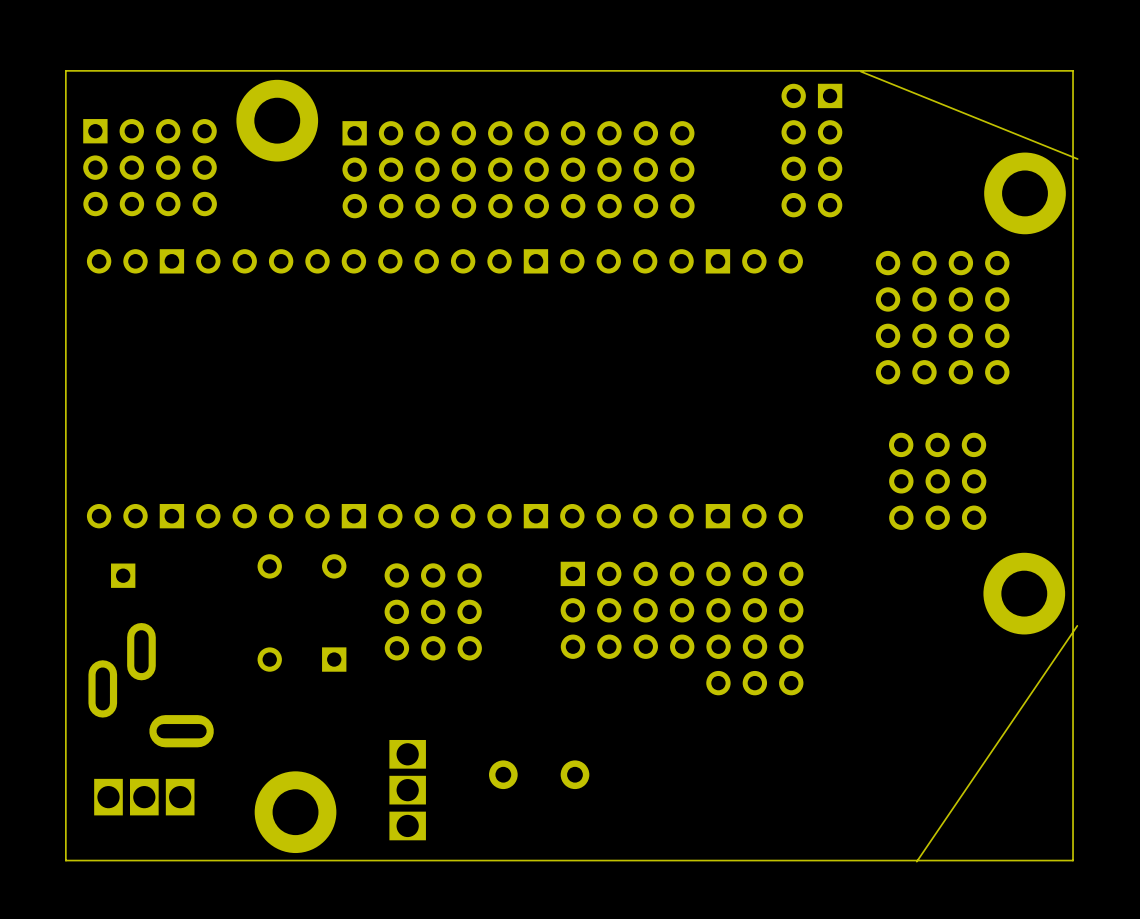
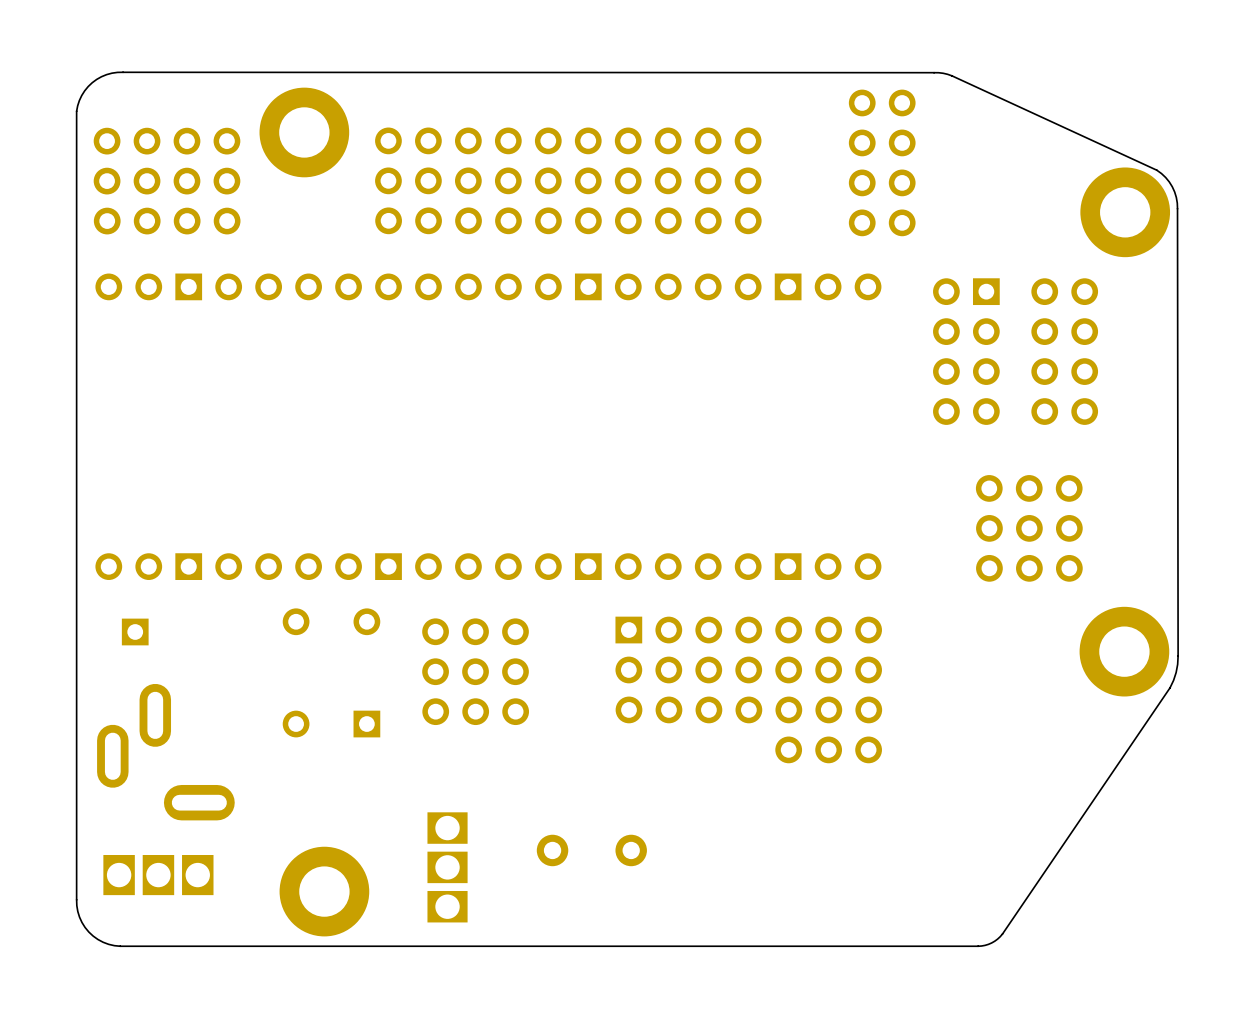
board edge: (1073, 70) (65, 70) (65, 860) (1073, 860) (1073, 70) -> (123, 72) (938, 72) (951, 75) (1156, 170) (1165, 177) (1174, 191) (1177, 208) (1178, 656) (1176, 672) (1170, 687) (1000, 936) (988, 944) (978, 946) (120, 946) (103, 942) (88, 932) (79, 917) (76, 899) (76, 111) (81, 95) (92, 82) (106, 74) (123, 72)
board edge: (860, 71) (1077, 159) -> none
part footprint: [781, 83, 843, 218] -> [848, 89, 916, 237]
part footprint: [83, 119, 217, 217] -> [93, 127, 241, 235]
part footprint: [342, 121, 695, 219] -> [375, 127, 762, 235]
part: (942, 317) -> none
part: none -> (966, 351)
part: none -> (1064, 351)
board edge: (1077, 625) (916, 861) -> none

